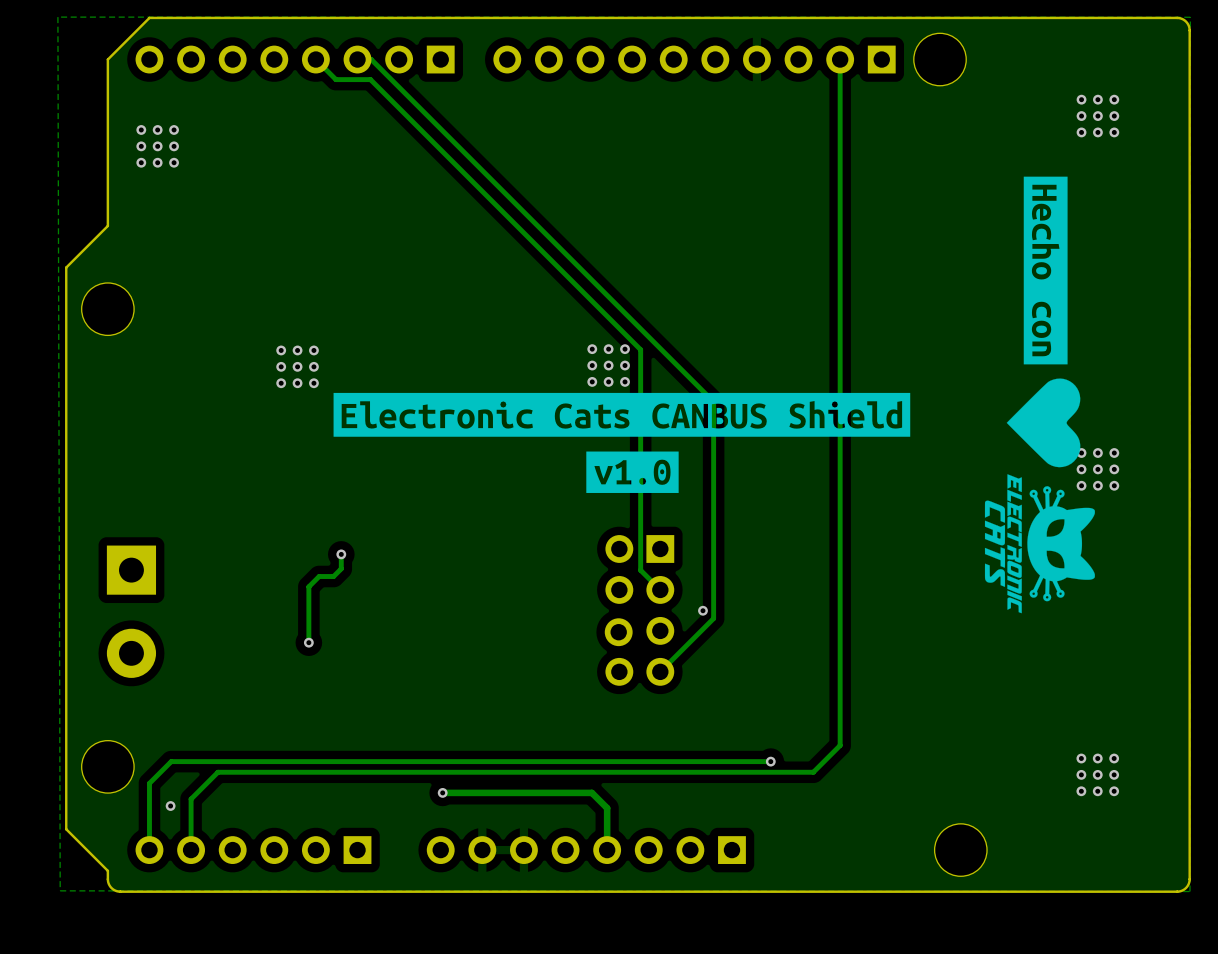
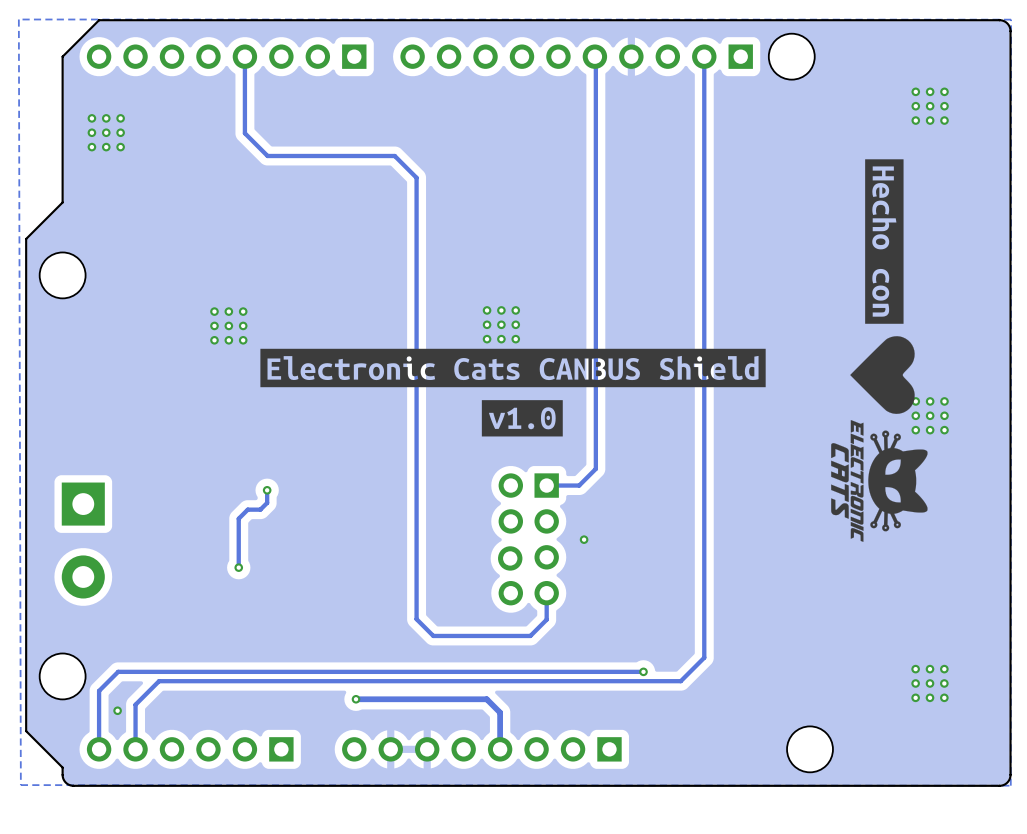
track: (315, 59) (335, 79) (370, 79) (640, 349) (640, 570) (660, 589) -> none
track: (357, 59) (371, 59) (713, 401) (713, 618) (660, 671) -> (244, 56) (244, 133) (267, 156) (394, 156) (416, 177) (416, 619) (433, 635) (530, 635) (546, 619) (546, 593)
track: none -> (594, 56) (595, 468) (579, 485) (546, 485)

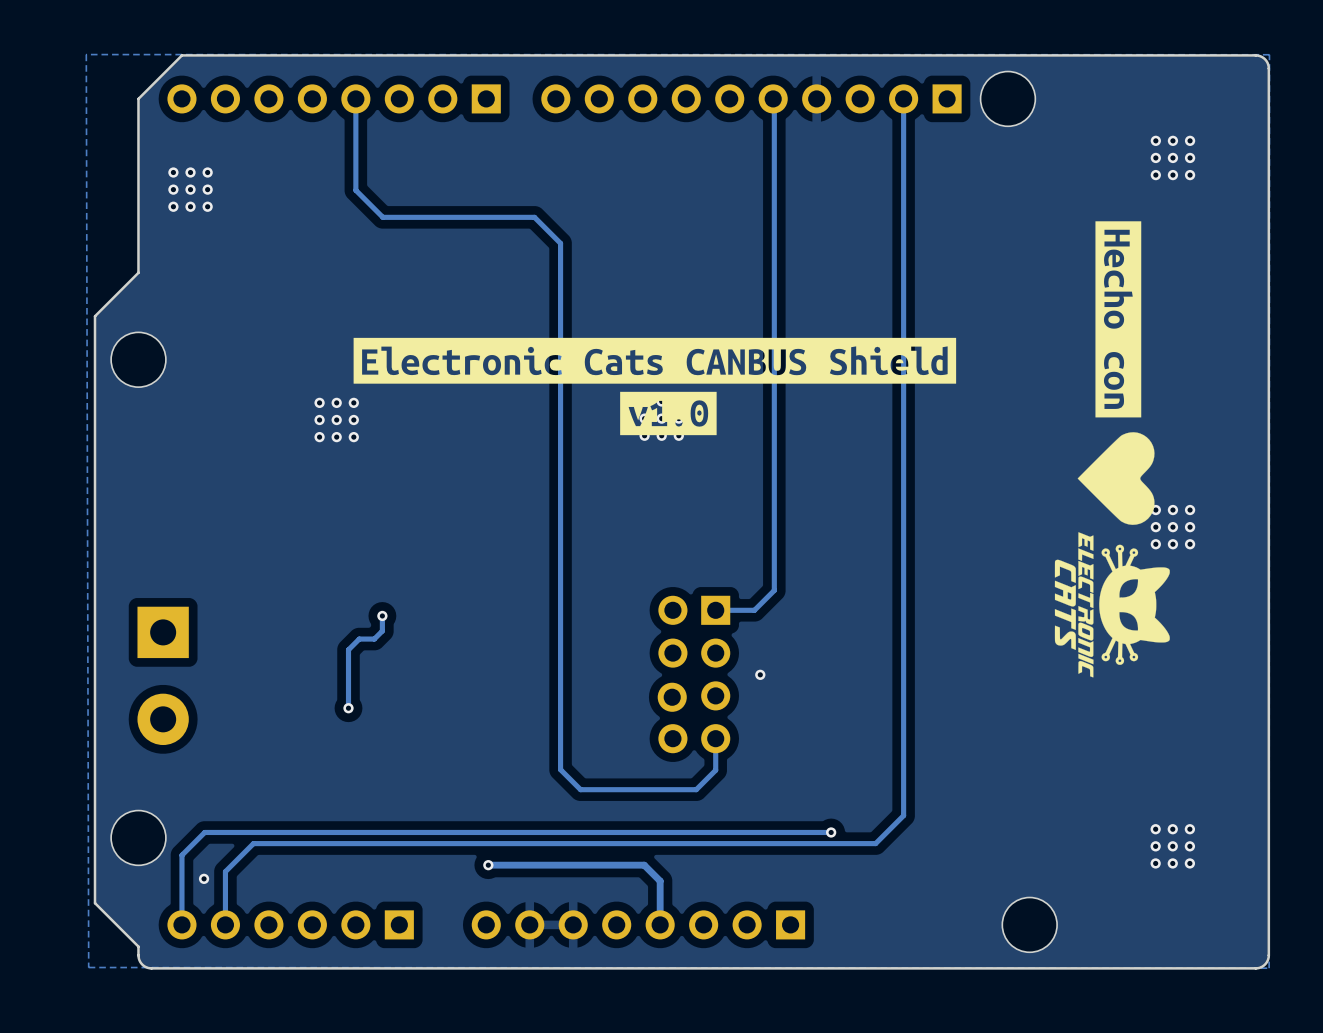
drawing position: (513, 367) -> (654, 360)
drawing position: (522, 418) -> (668, 413)

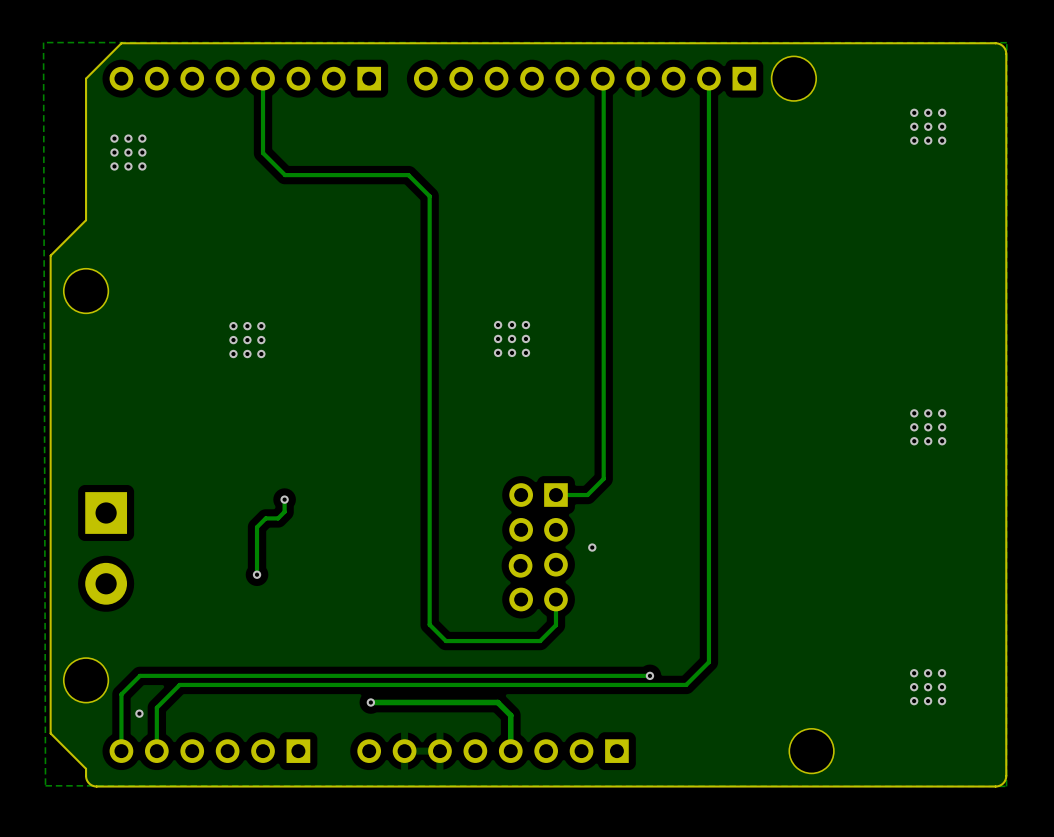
drawing: [1054, 221, 1170, 678] -> none
drawing: [353, 337, 957, 436] -> none

